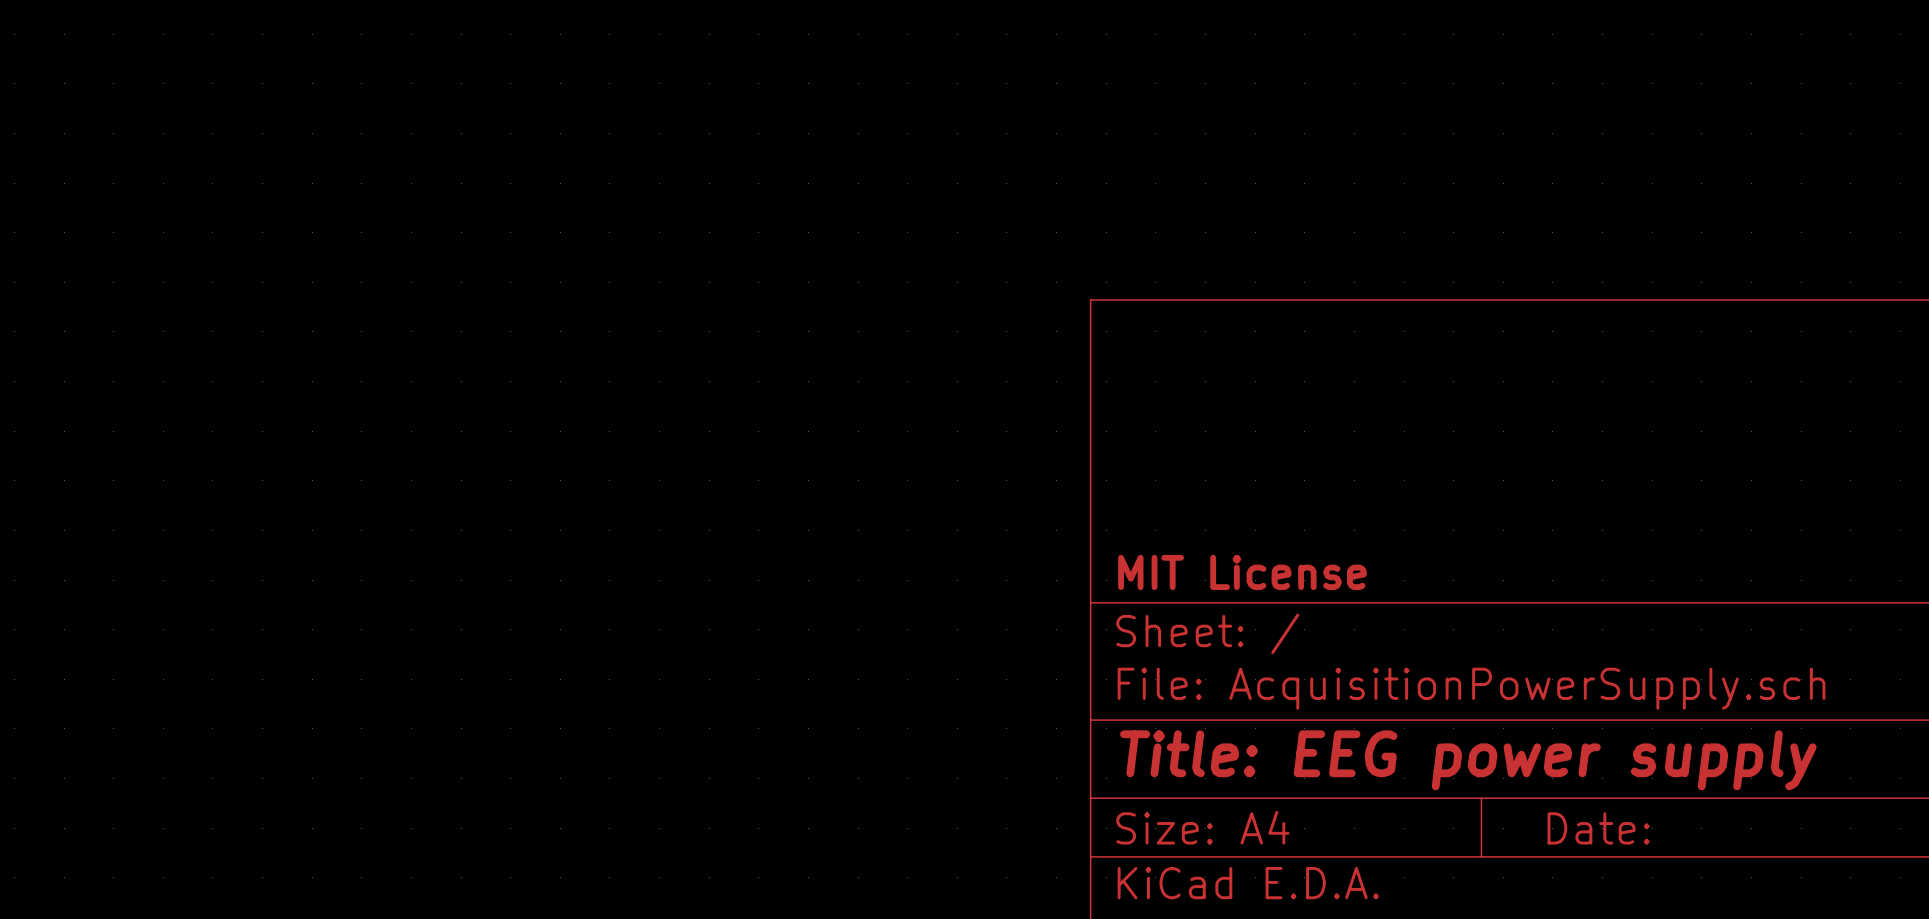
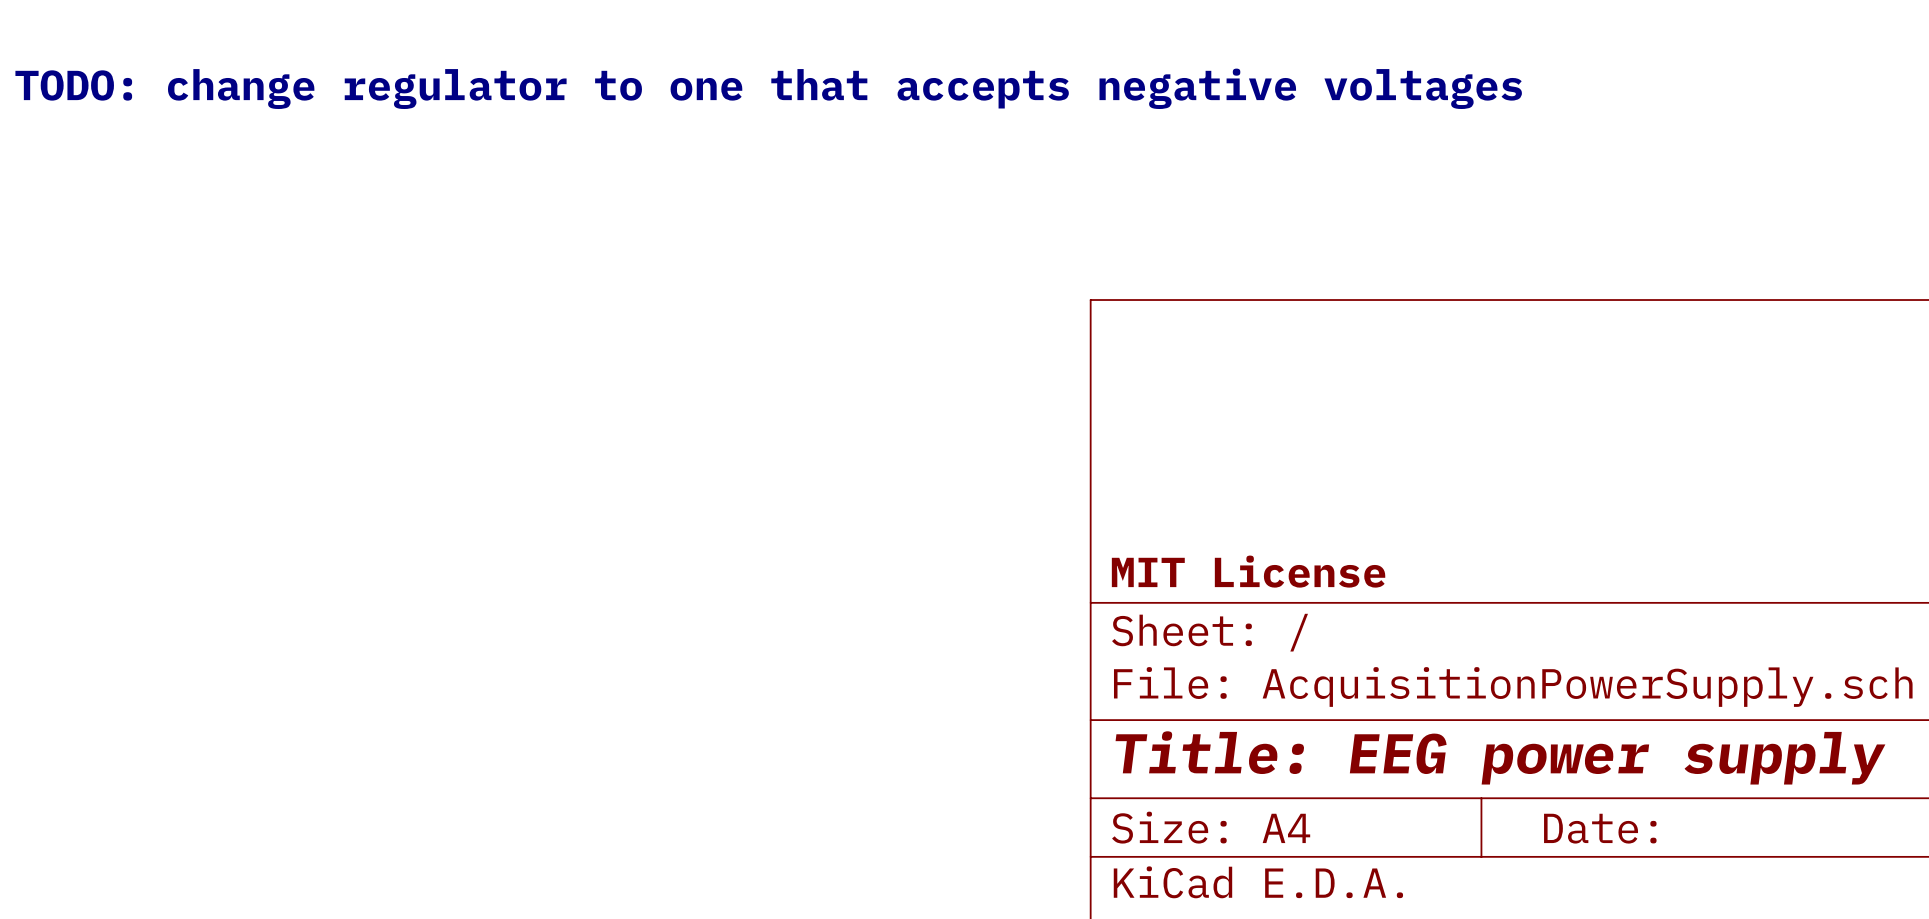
text: none -> TODO: change regulator to one that accepts negative voltages (768, 88)

